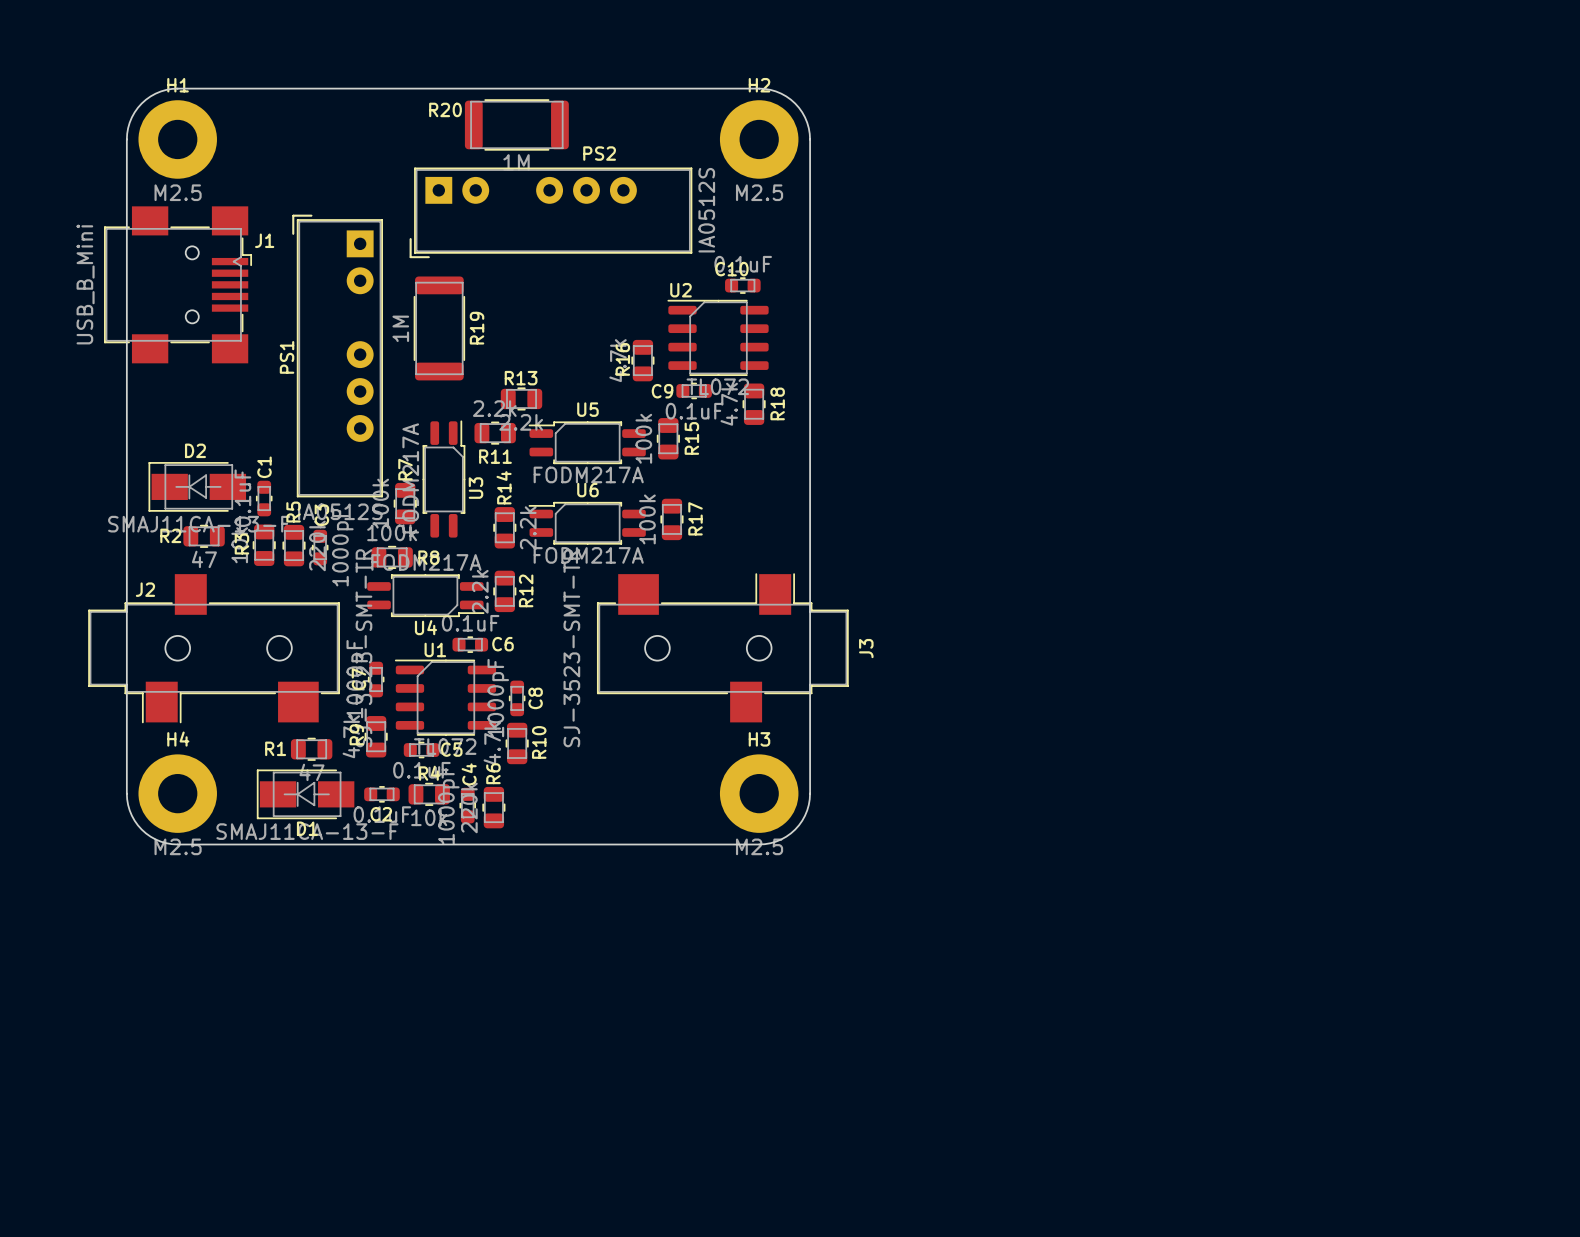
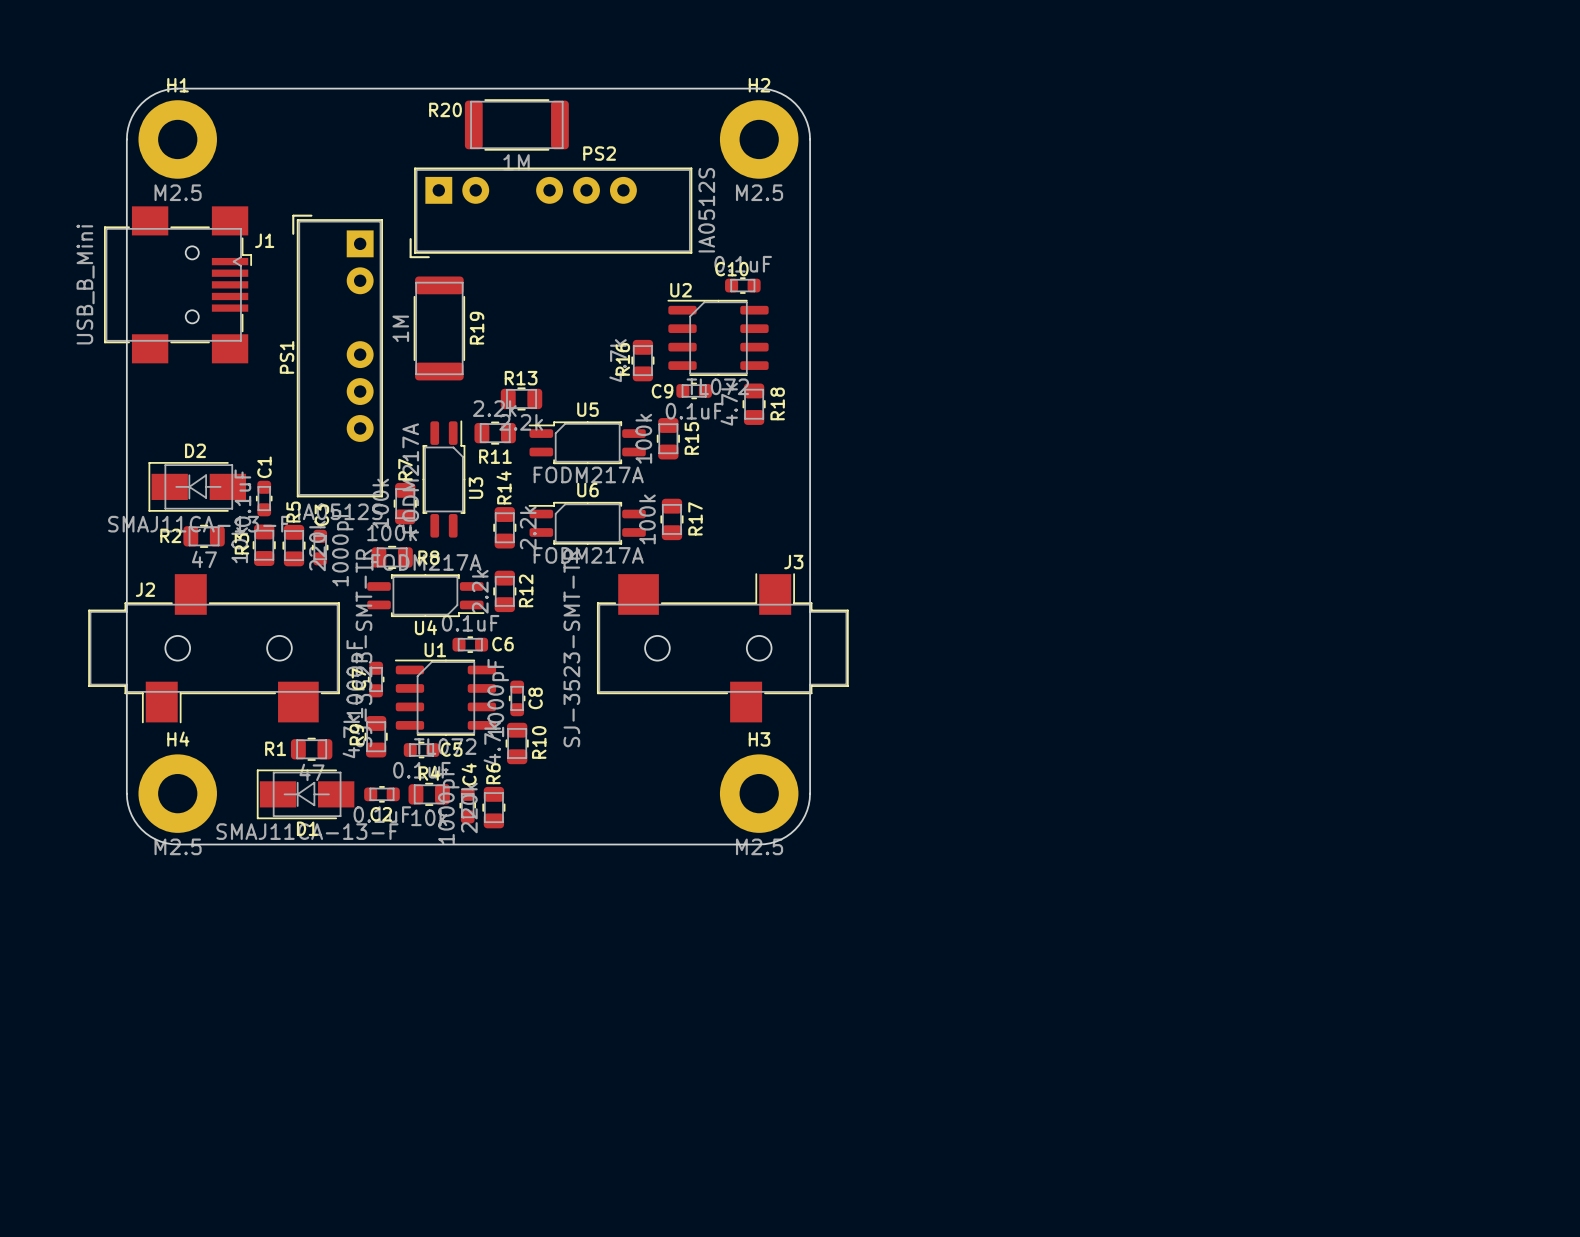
J3 name rotation: 0° (866, 648) -> 90° clockwise (793, 562)
J3 name position: J3 (866, 648) -> J3 (793, 562)

